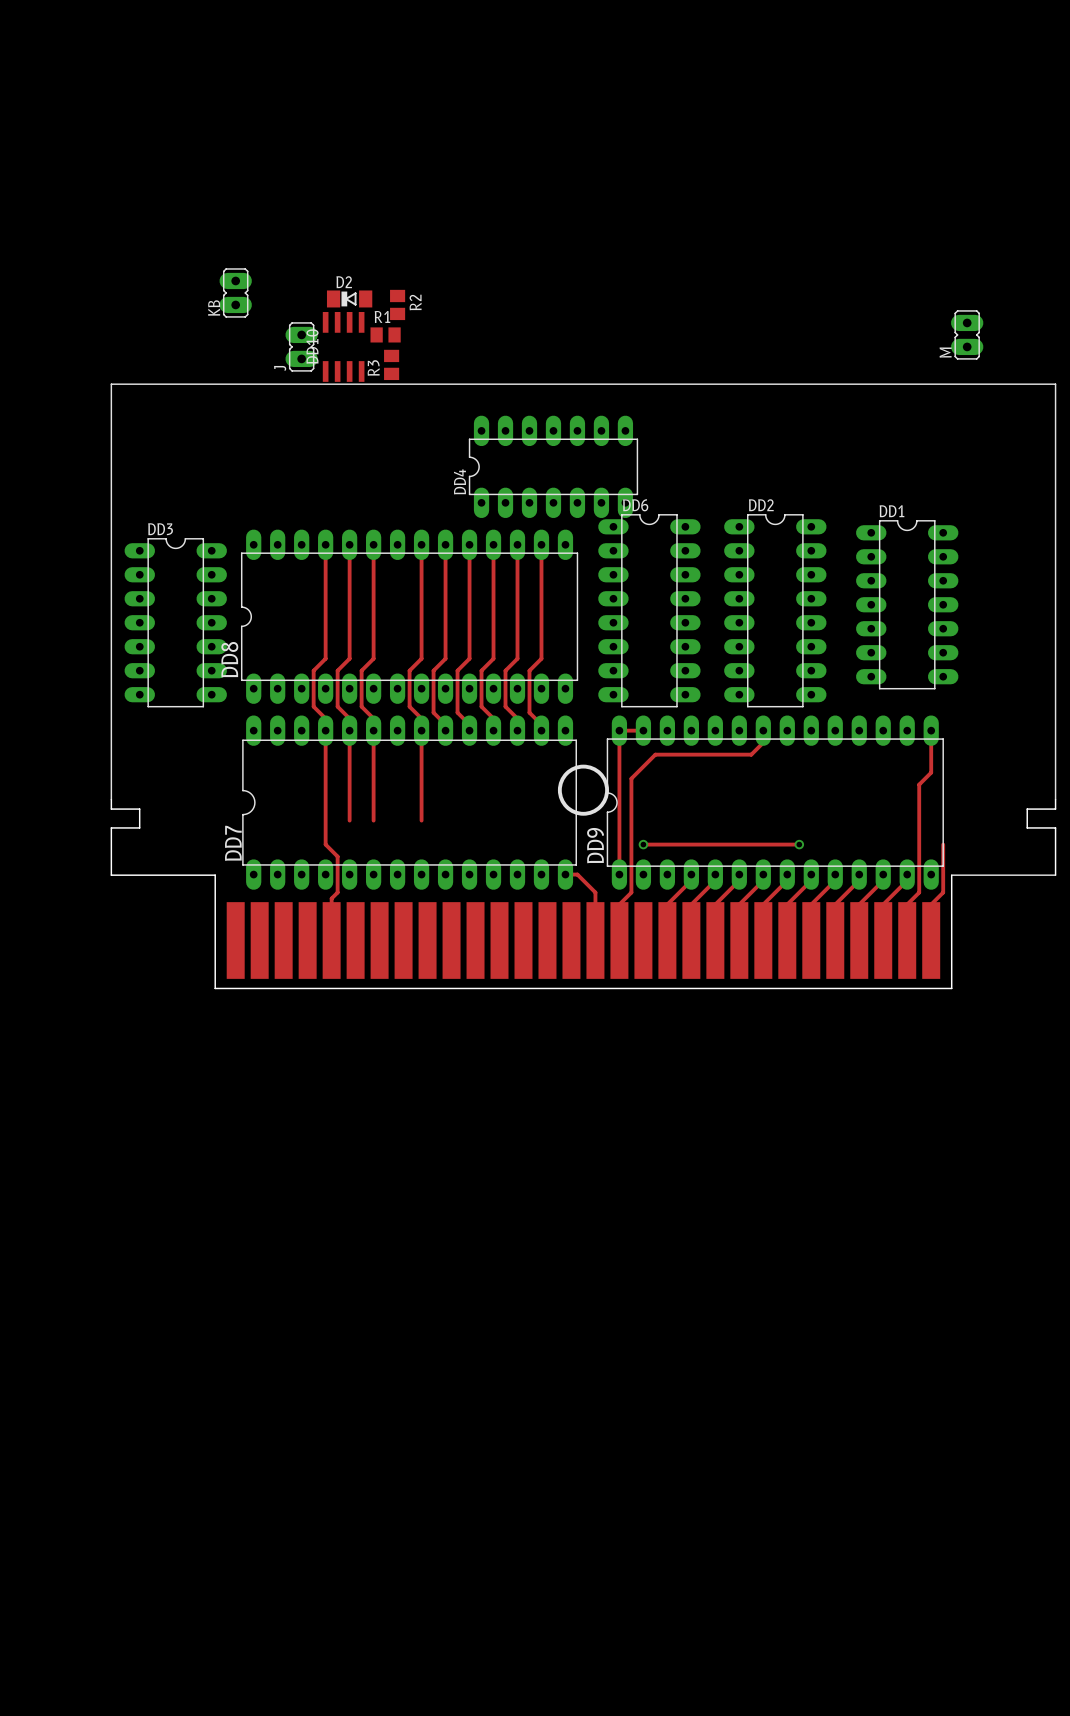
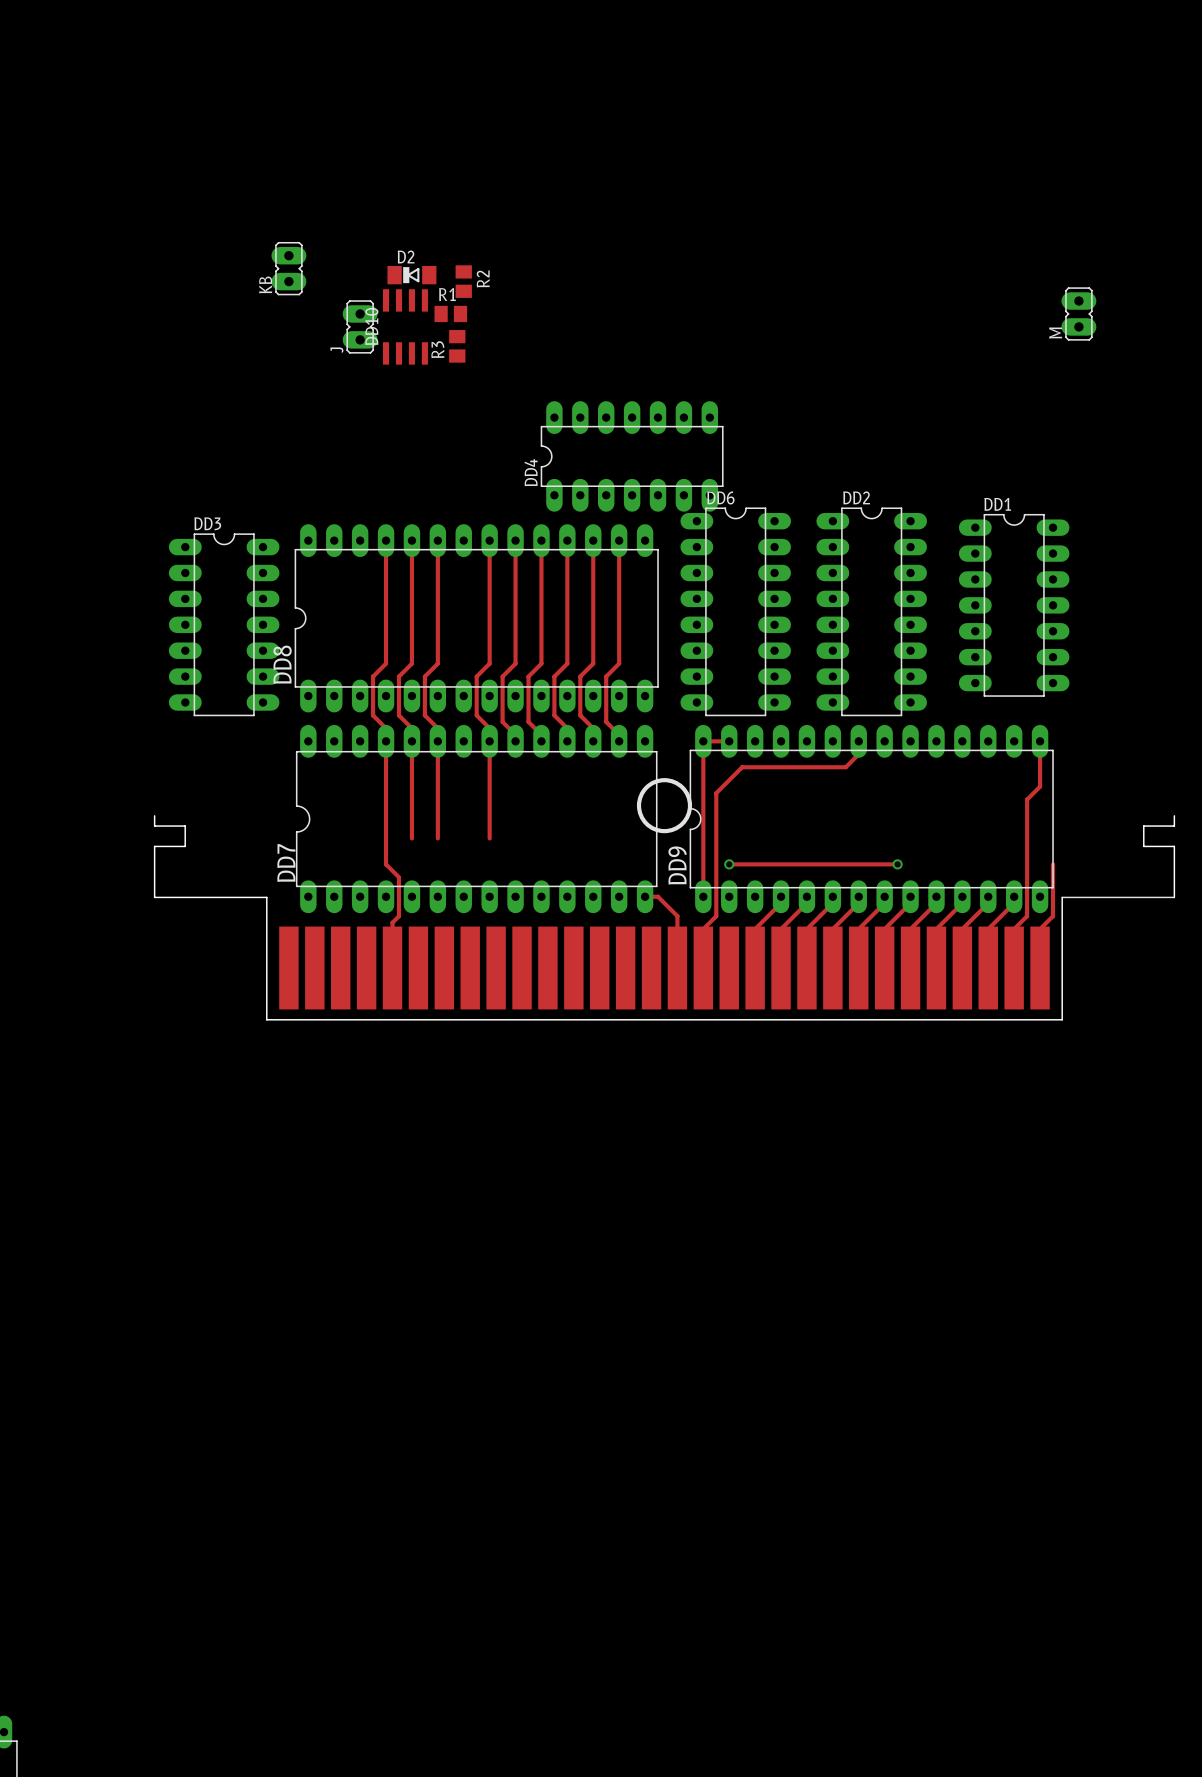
part: (583, 686) -> none
part: none -> (664, 917)

